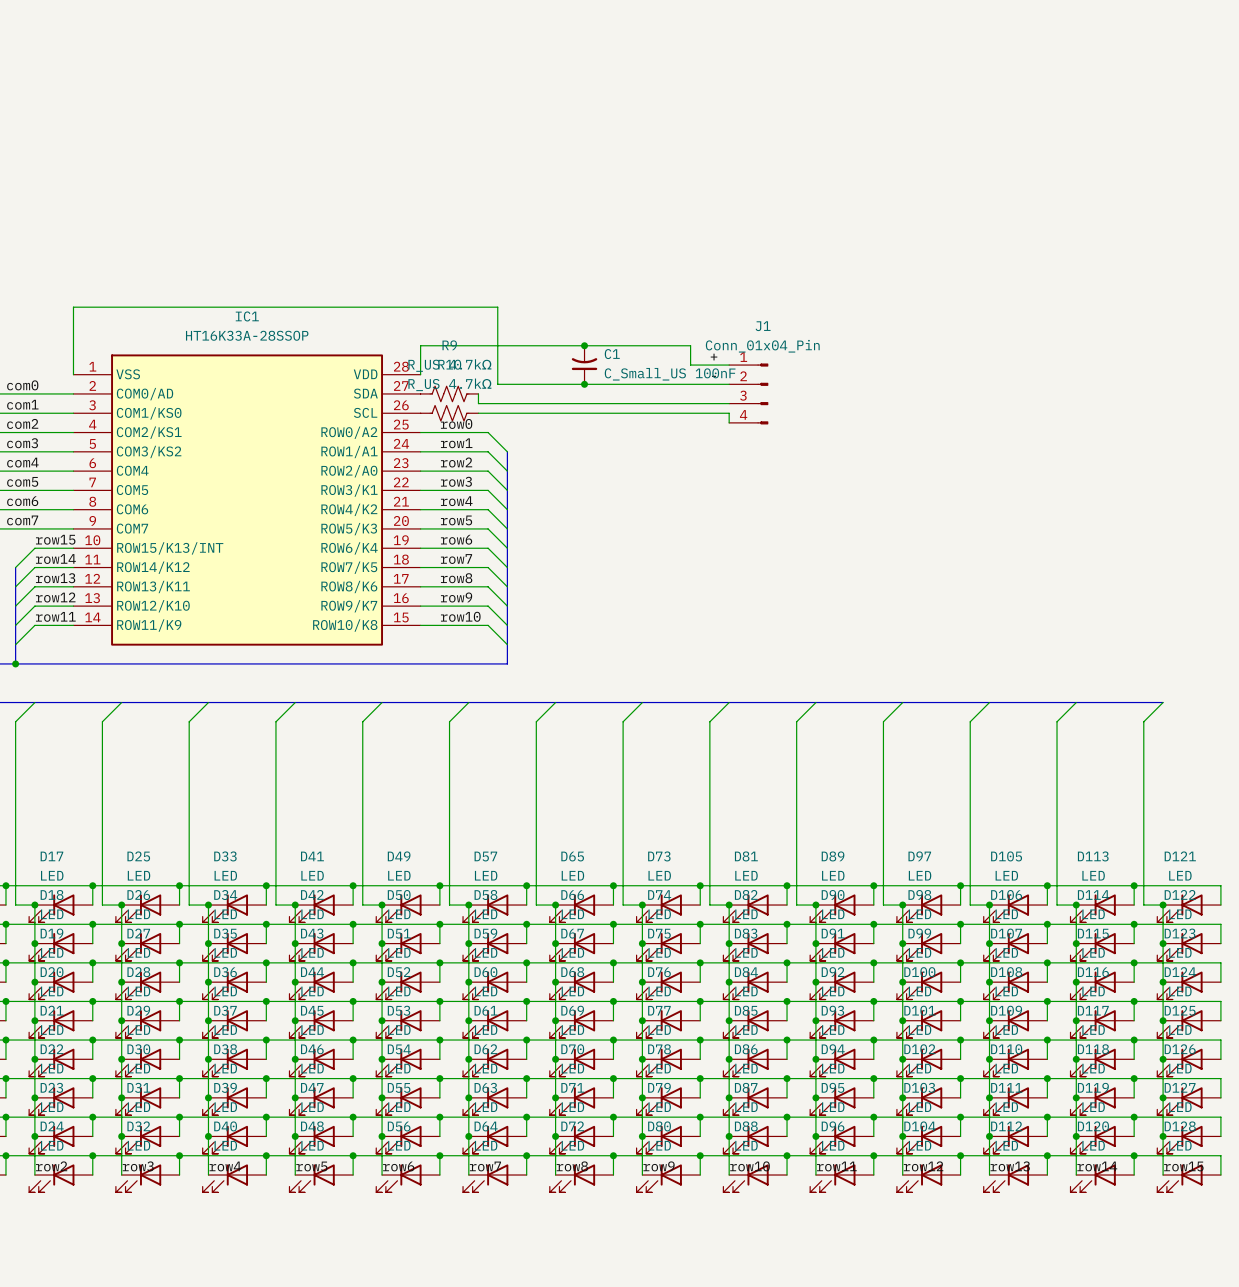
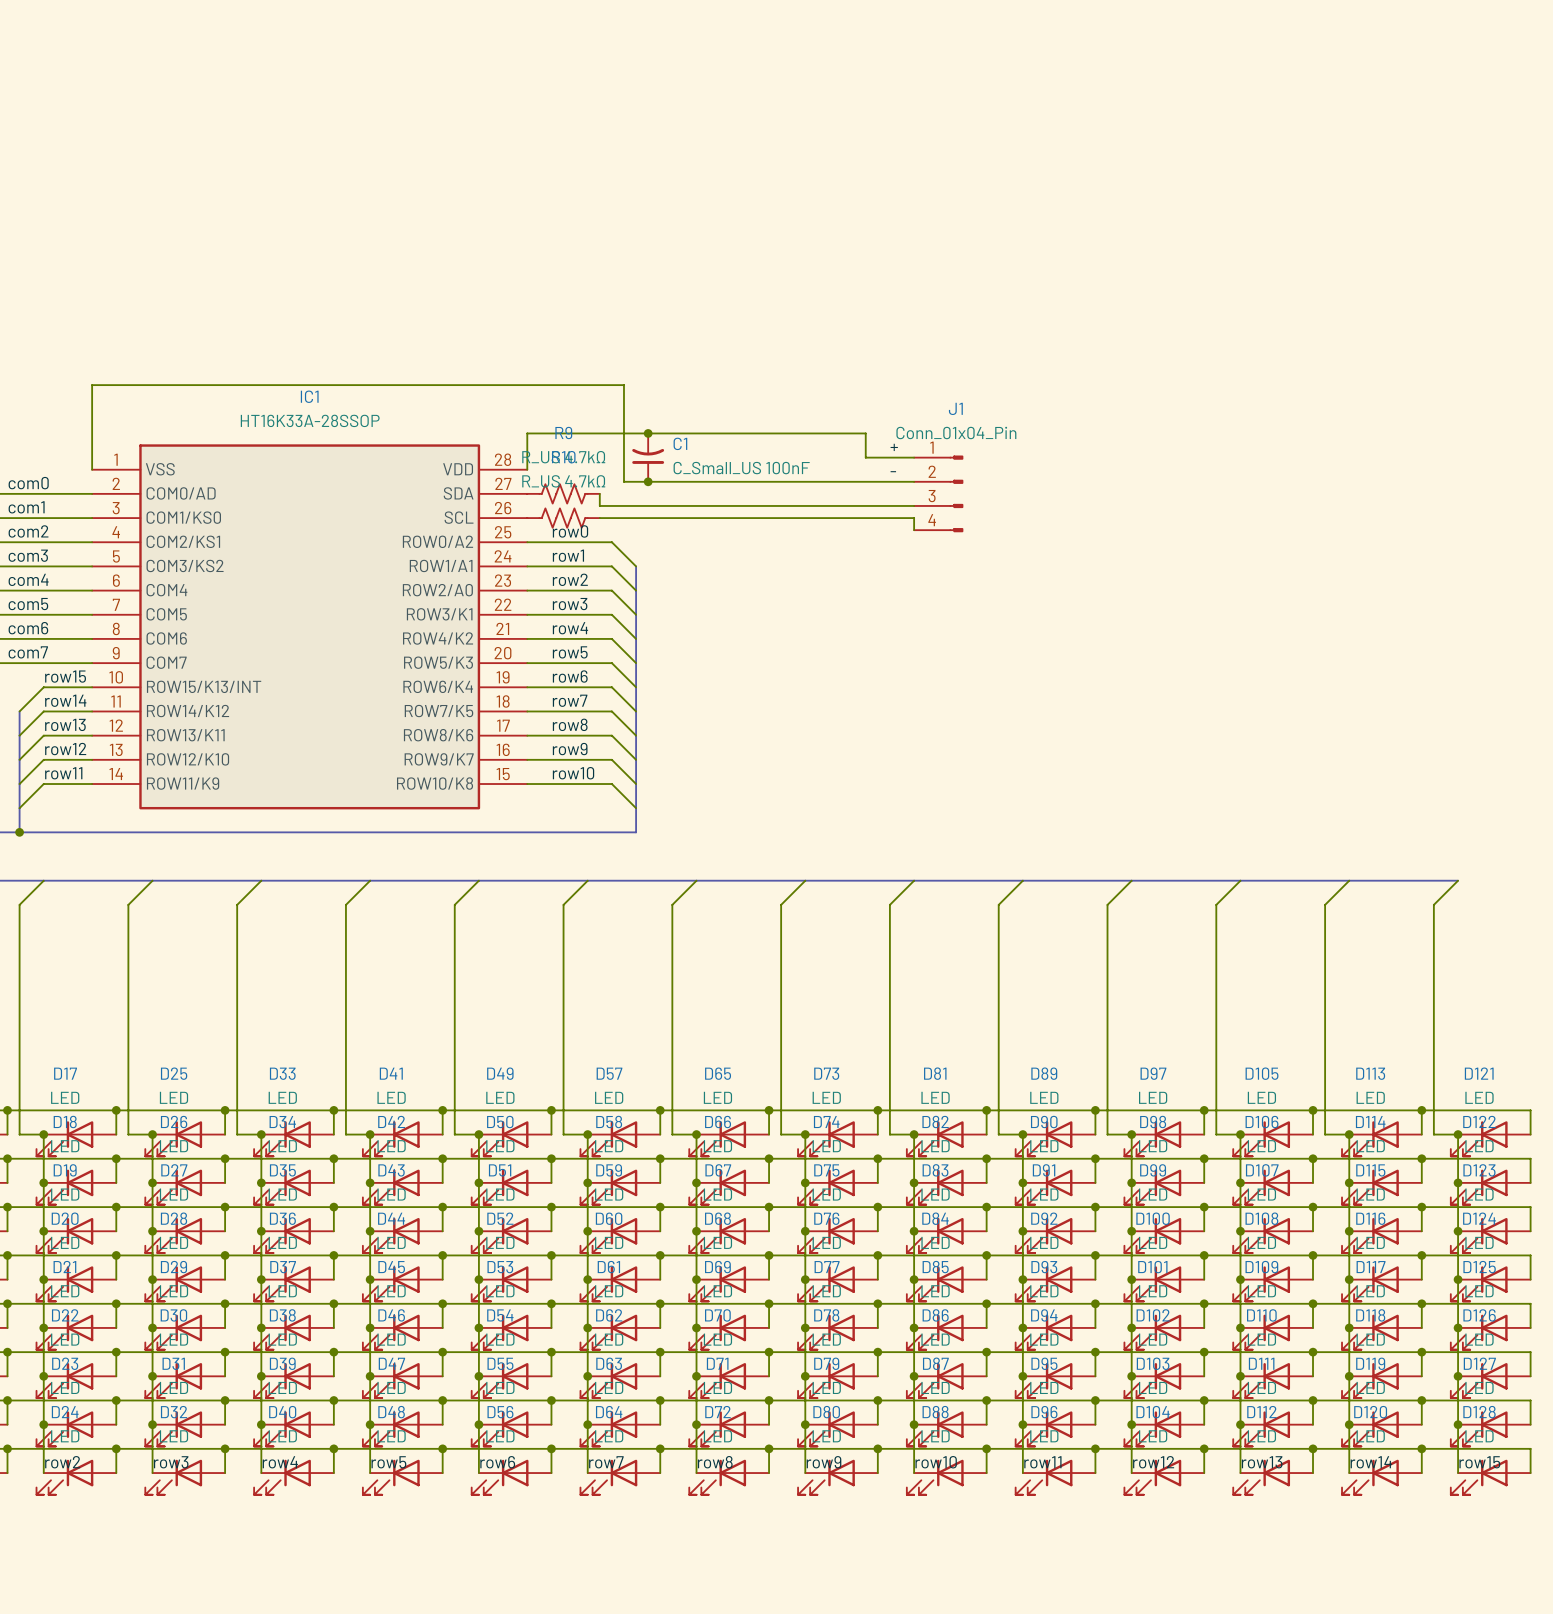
junction: none -> (648, 433)
junction: (584, 345) -> none
C1 position: (584, 365) -> (648, 457)
junction: none -> (648, 481)
junction: (584, 384) -> none

